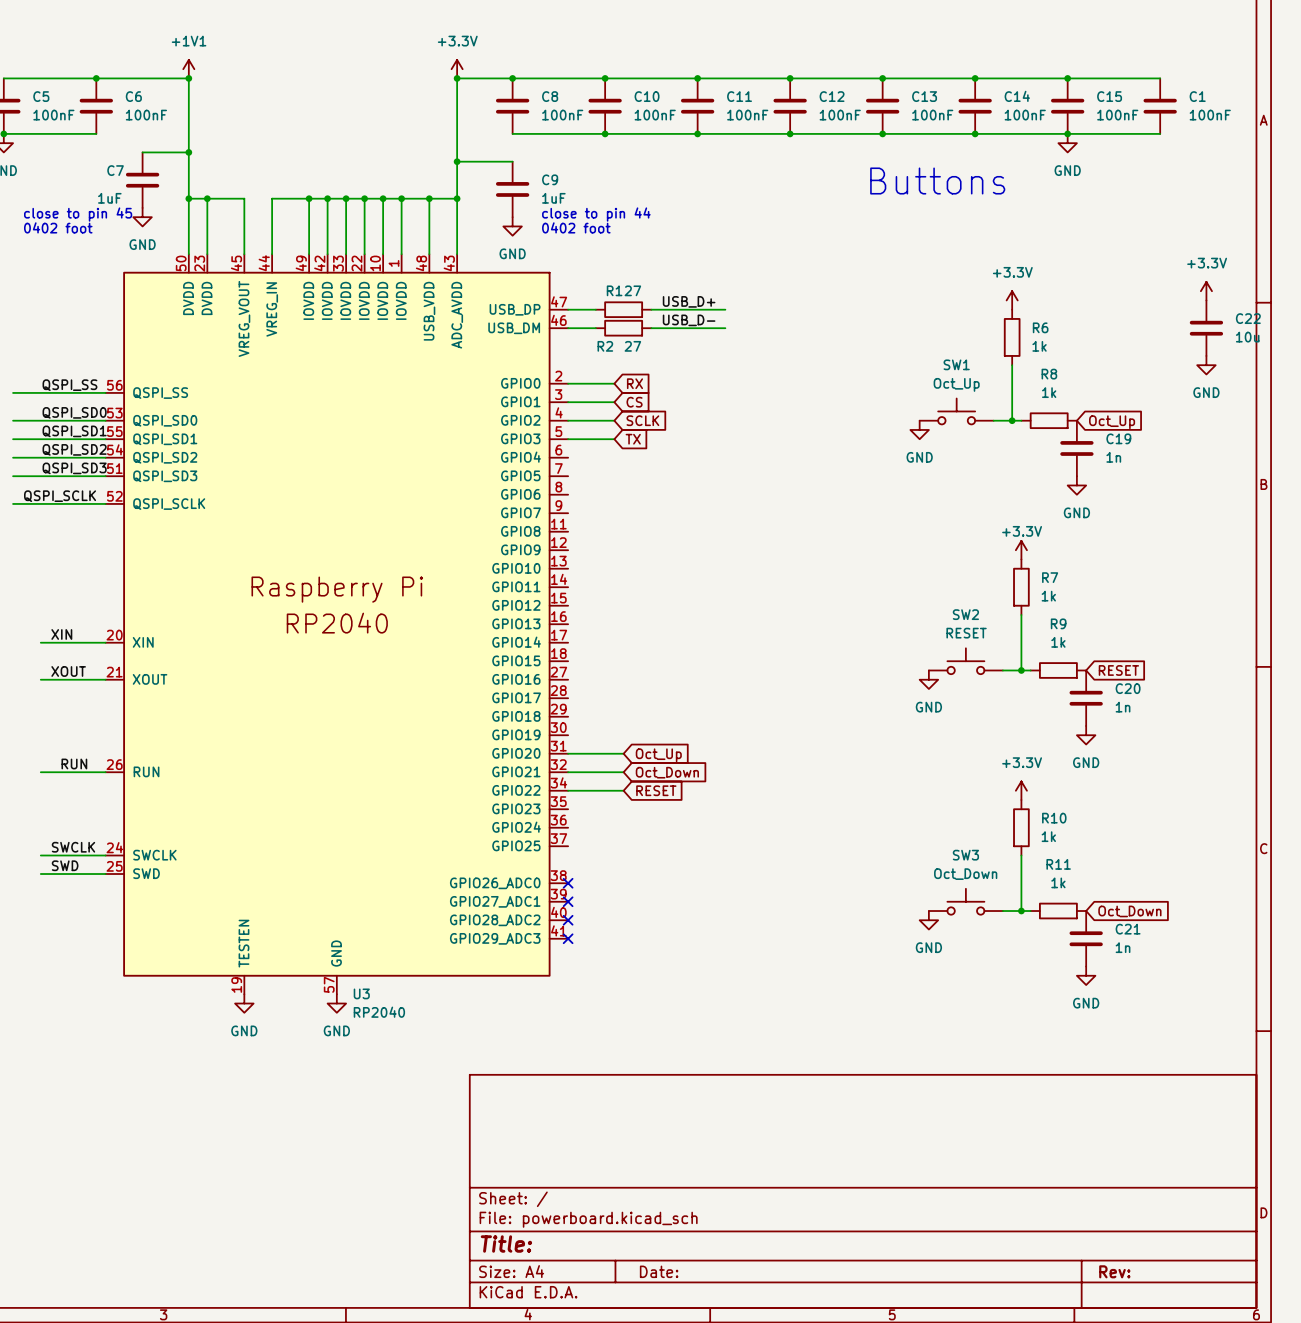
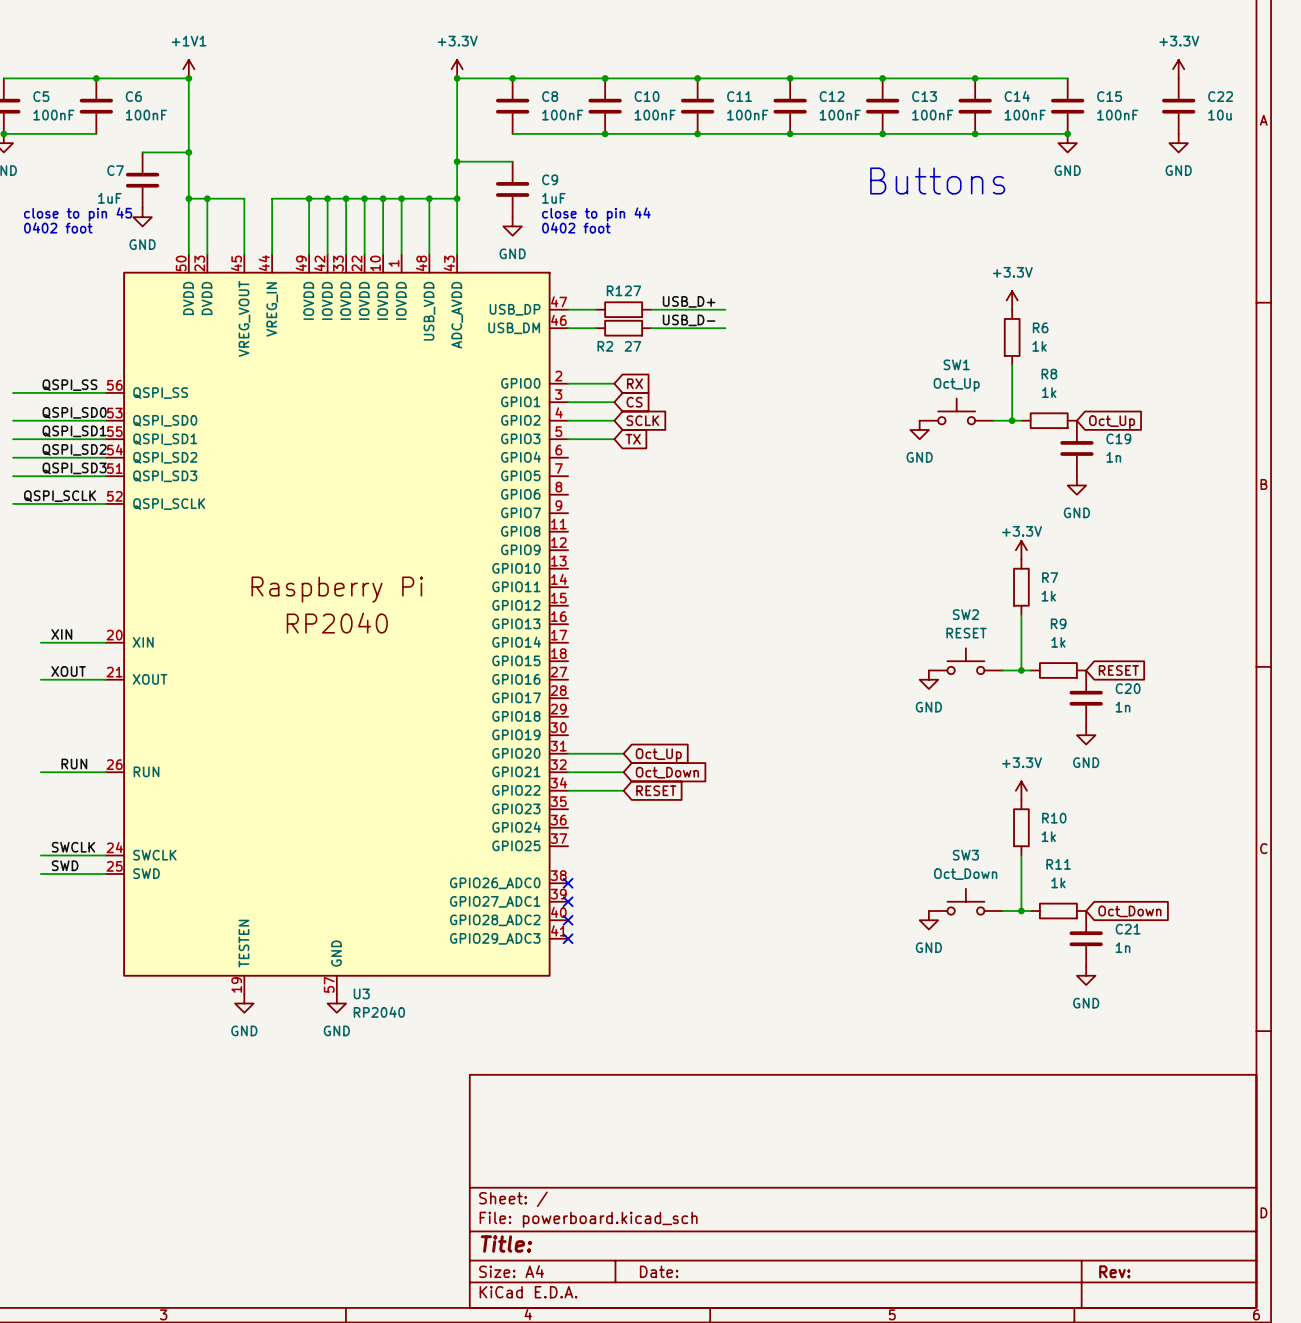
power symbol: none -> +3.3V (1178, 69)
wire: (1067, 78) (1160, 78) -> none
junction: (1067, 78) -> none
C1: 100nF (1160, 106) -> none
wire: (1067, 133) (1160, 133) -> none
power symbol: none -> GND (1178, 143)
power symbol: +3.3V (1206, 291) -> none
C22 position: (1206, 328) -> (1178, 106)
power symbol: GND (1206, 365) -> none

